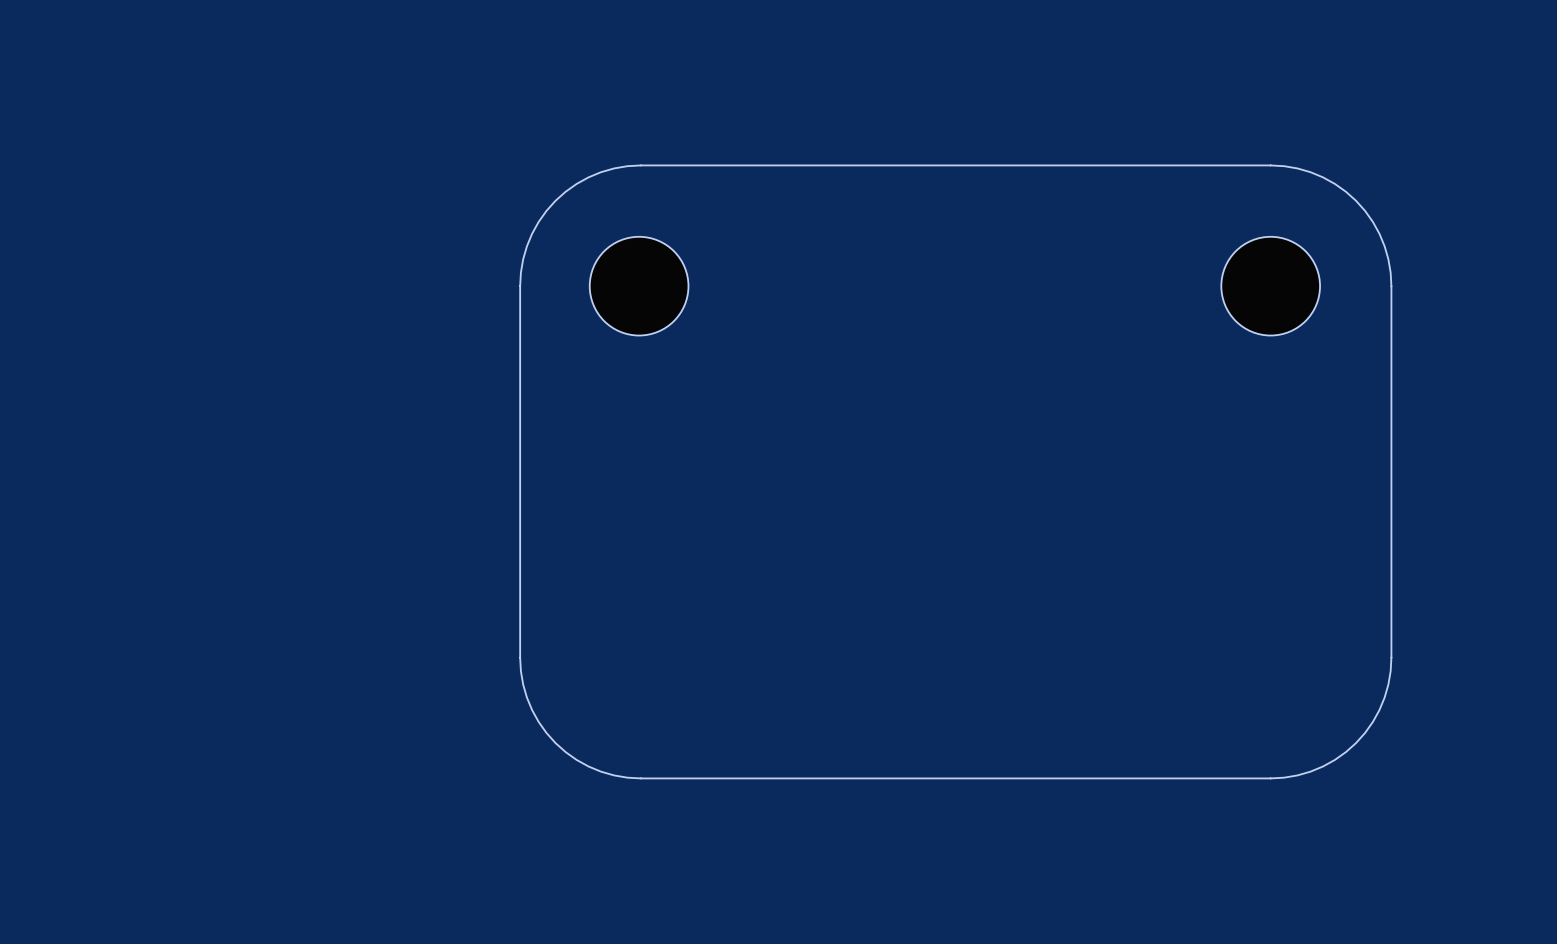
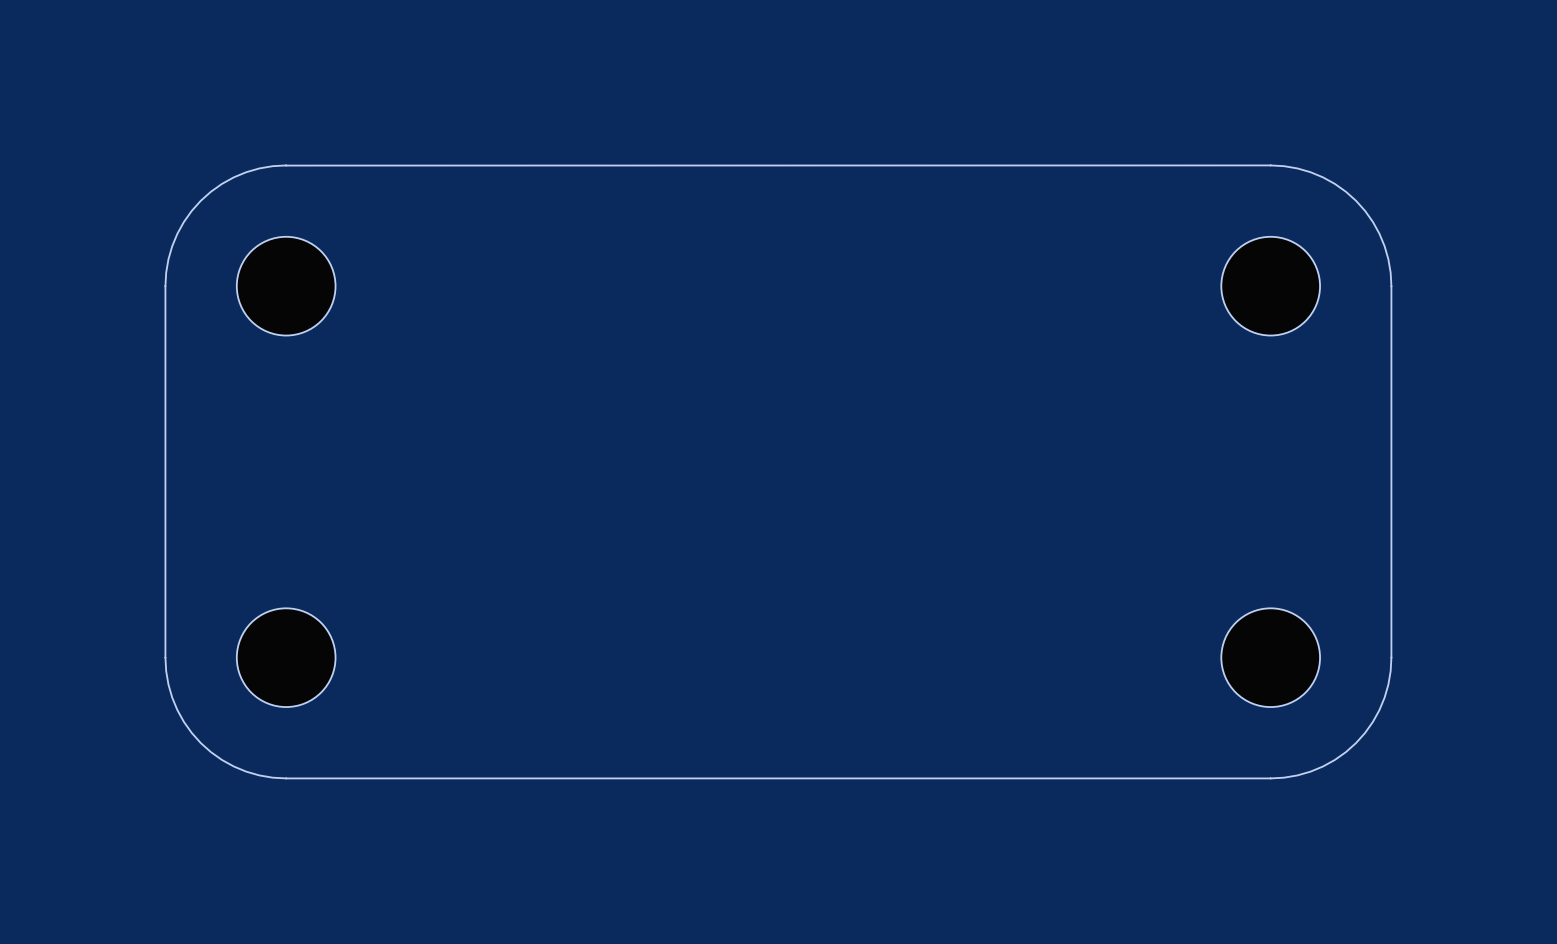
board edge: (1270, 165) (640, 165) (627, 166) (601, 172) (576, 183) (555, 200) (538, 221) (532, 233) (523, 259) (520, 272) (520, 671) (526, 697) (532, 710) (546, 732) (555, 743) (576, 759) (588, 766) (614, 775) (640, 778) -> (1270, 165) (286, 165) (272, 166) (246, 172) (221, 183) (200, 200) (183, 221) (172, 246) (166, 272) (165, 286) (166, 671) (168, 684) (177, 710) (191, 732) (210, 752) (233, 766) (259, 775) (272, 777) (640, 778)
part: none -> (286, 286)
part: (639, 286) -> none
part: none -> (286, 657)
part: none -> (1270, 657)

